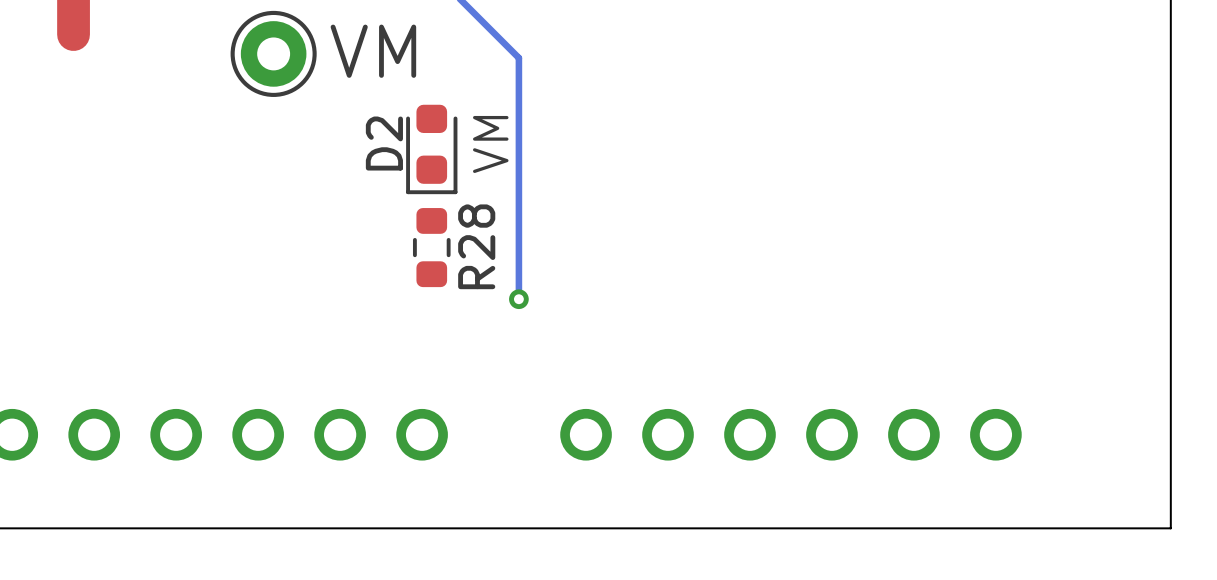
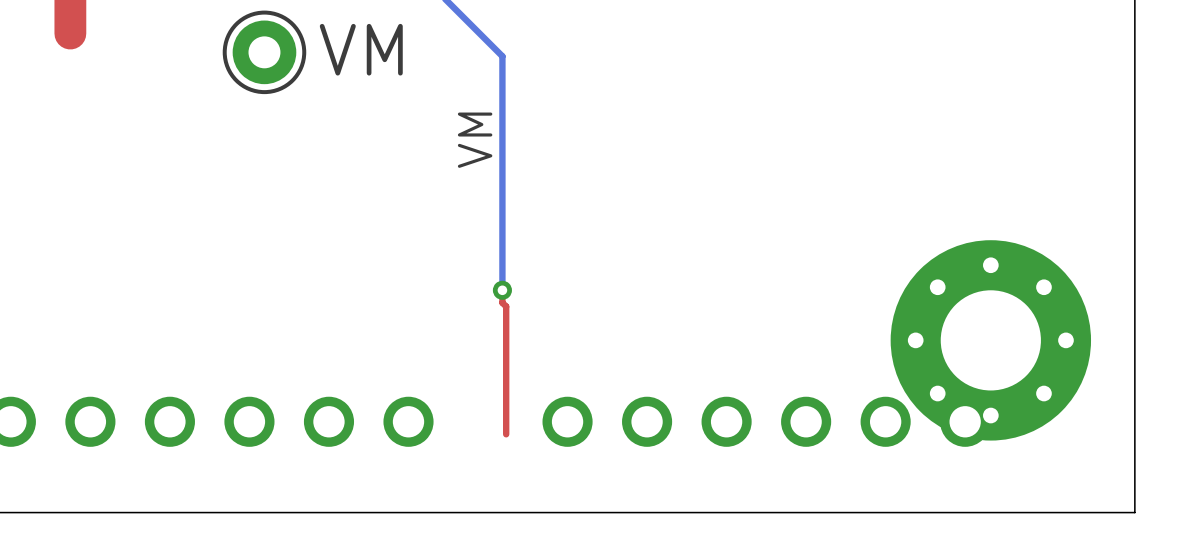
D2: (431, 149) -> none
R28: (431, 247) -> none
top track: none -> (502, 290) (502, 302) (506, 306) (506, 434)
part: none -> (990, 340)

